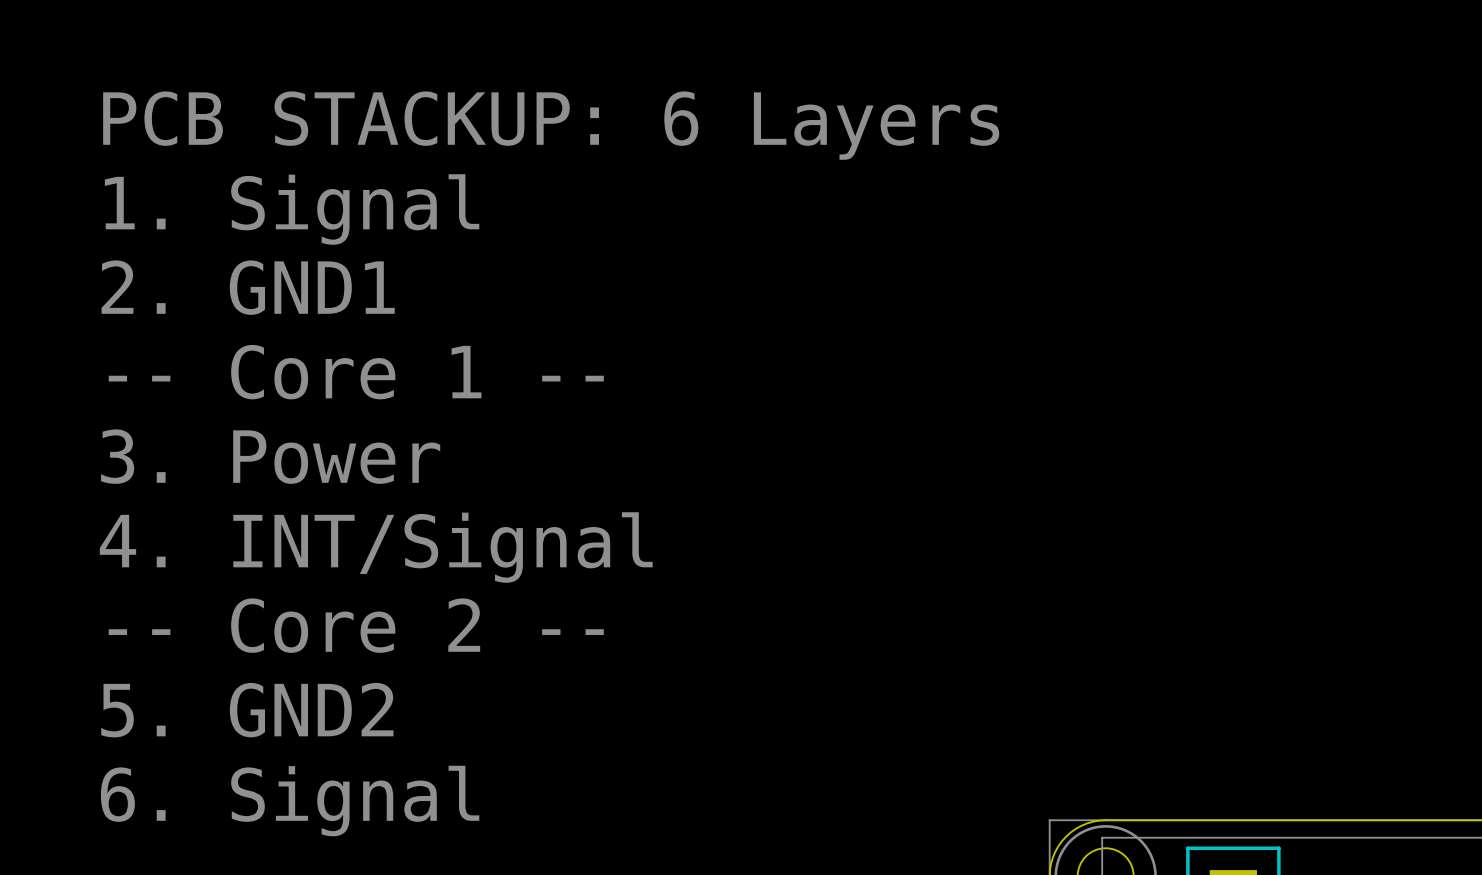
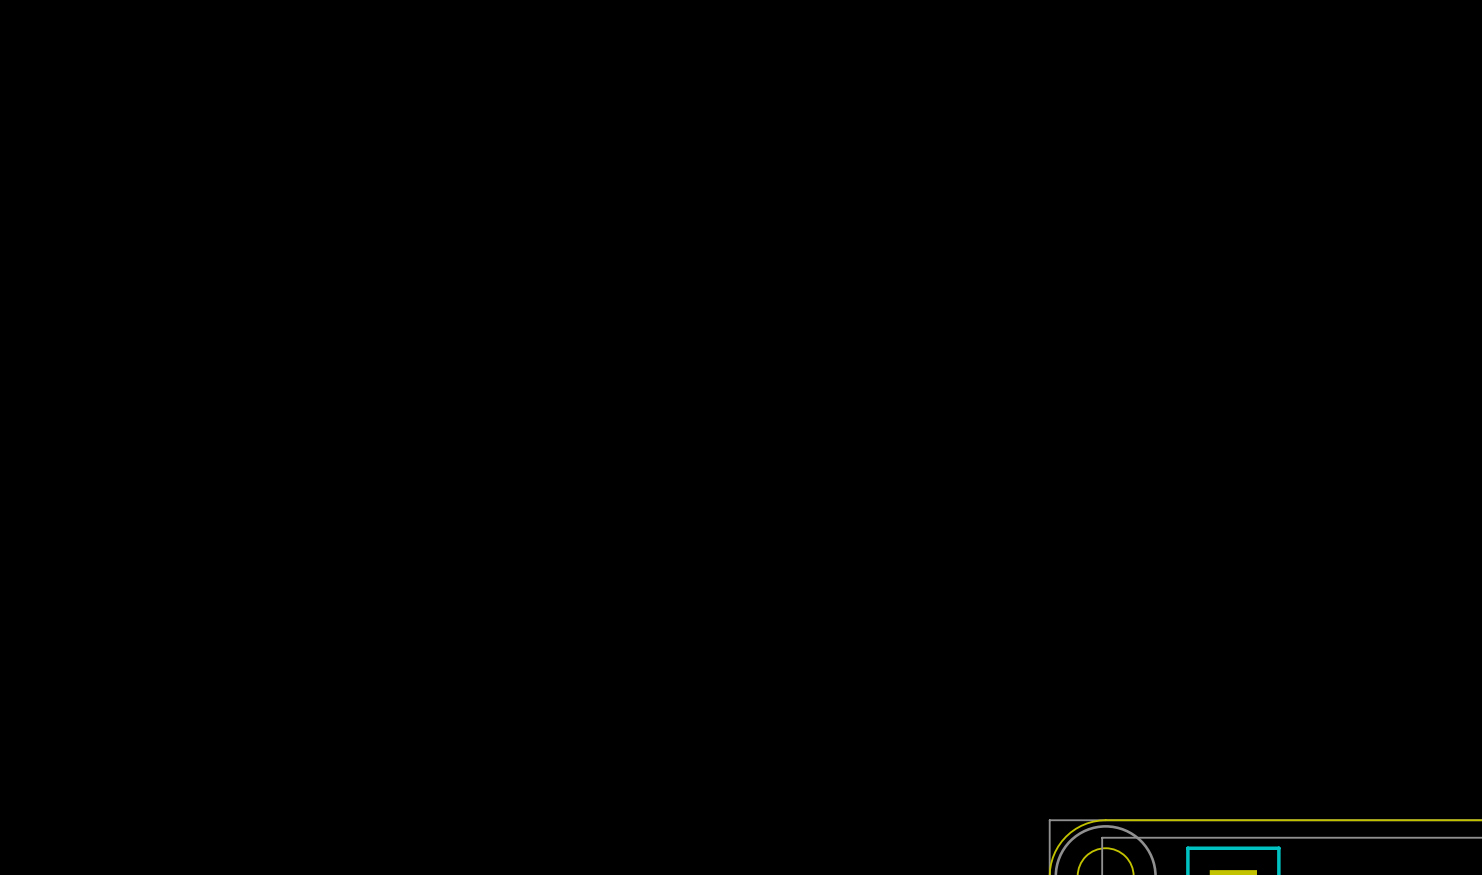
text: PCB STACKUP: 6 Layers (551, 125) -> none
text: 1. Signal (292, 209) -> none
text: 2. GND1 (248, 287) -> none
text: -- Core 1 -- (356, 372) -> none
text: 3. Power (270, 456) -> none
text: 4. INT/Signal (376, 547) -> none
text: -- Core 2 -- (356, 625) -> none
text: 5. GND2 (247, 710) -> none
text: 6. Signal (290, 801) -> none

